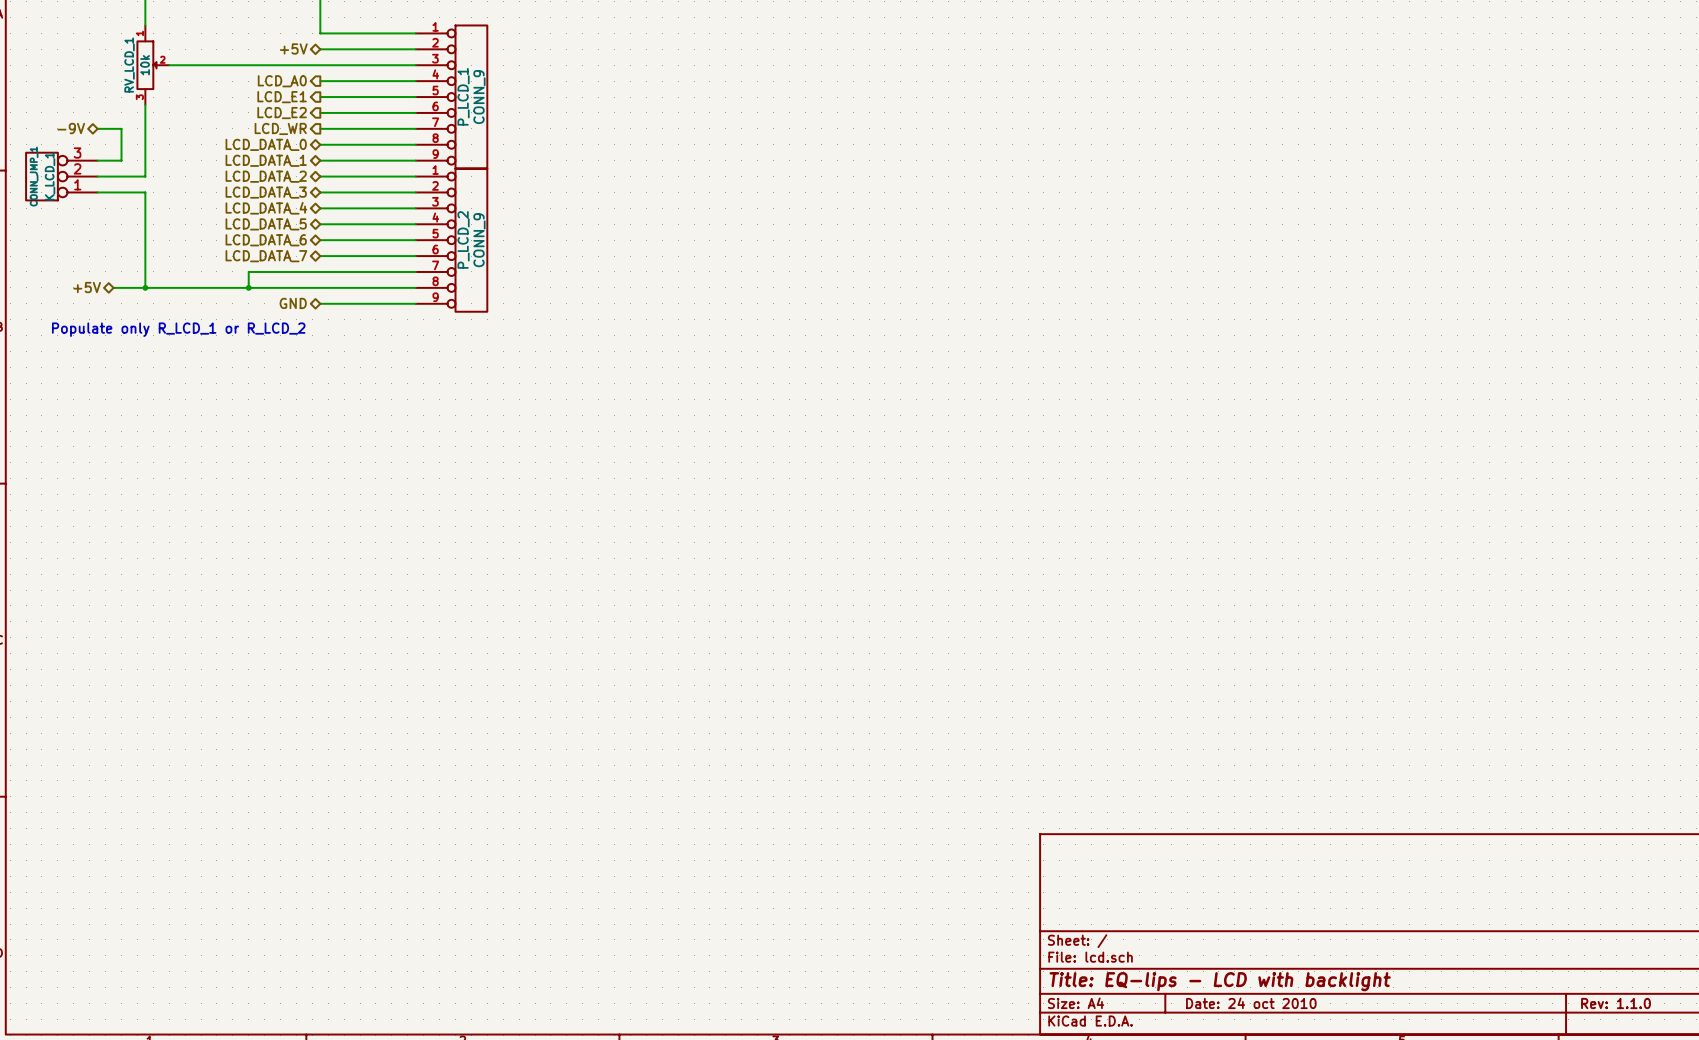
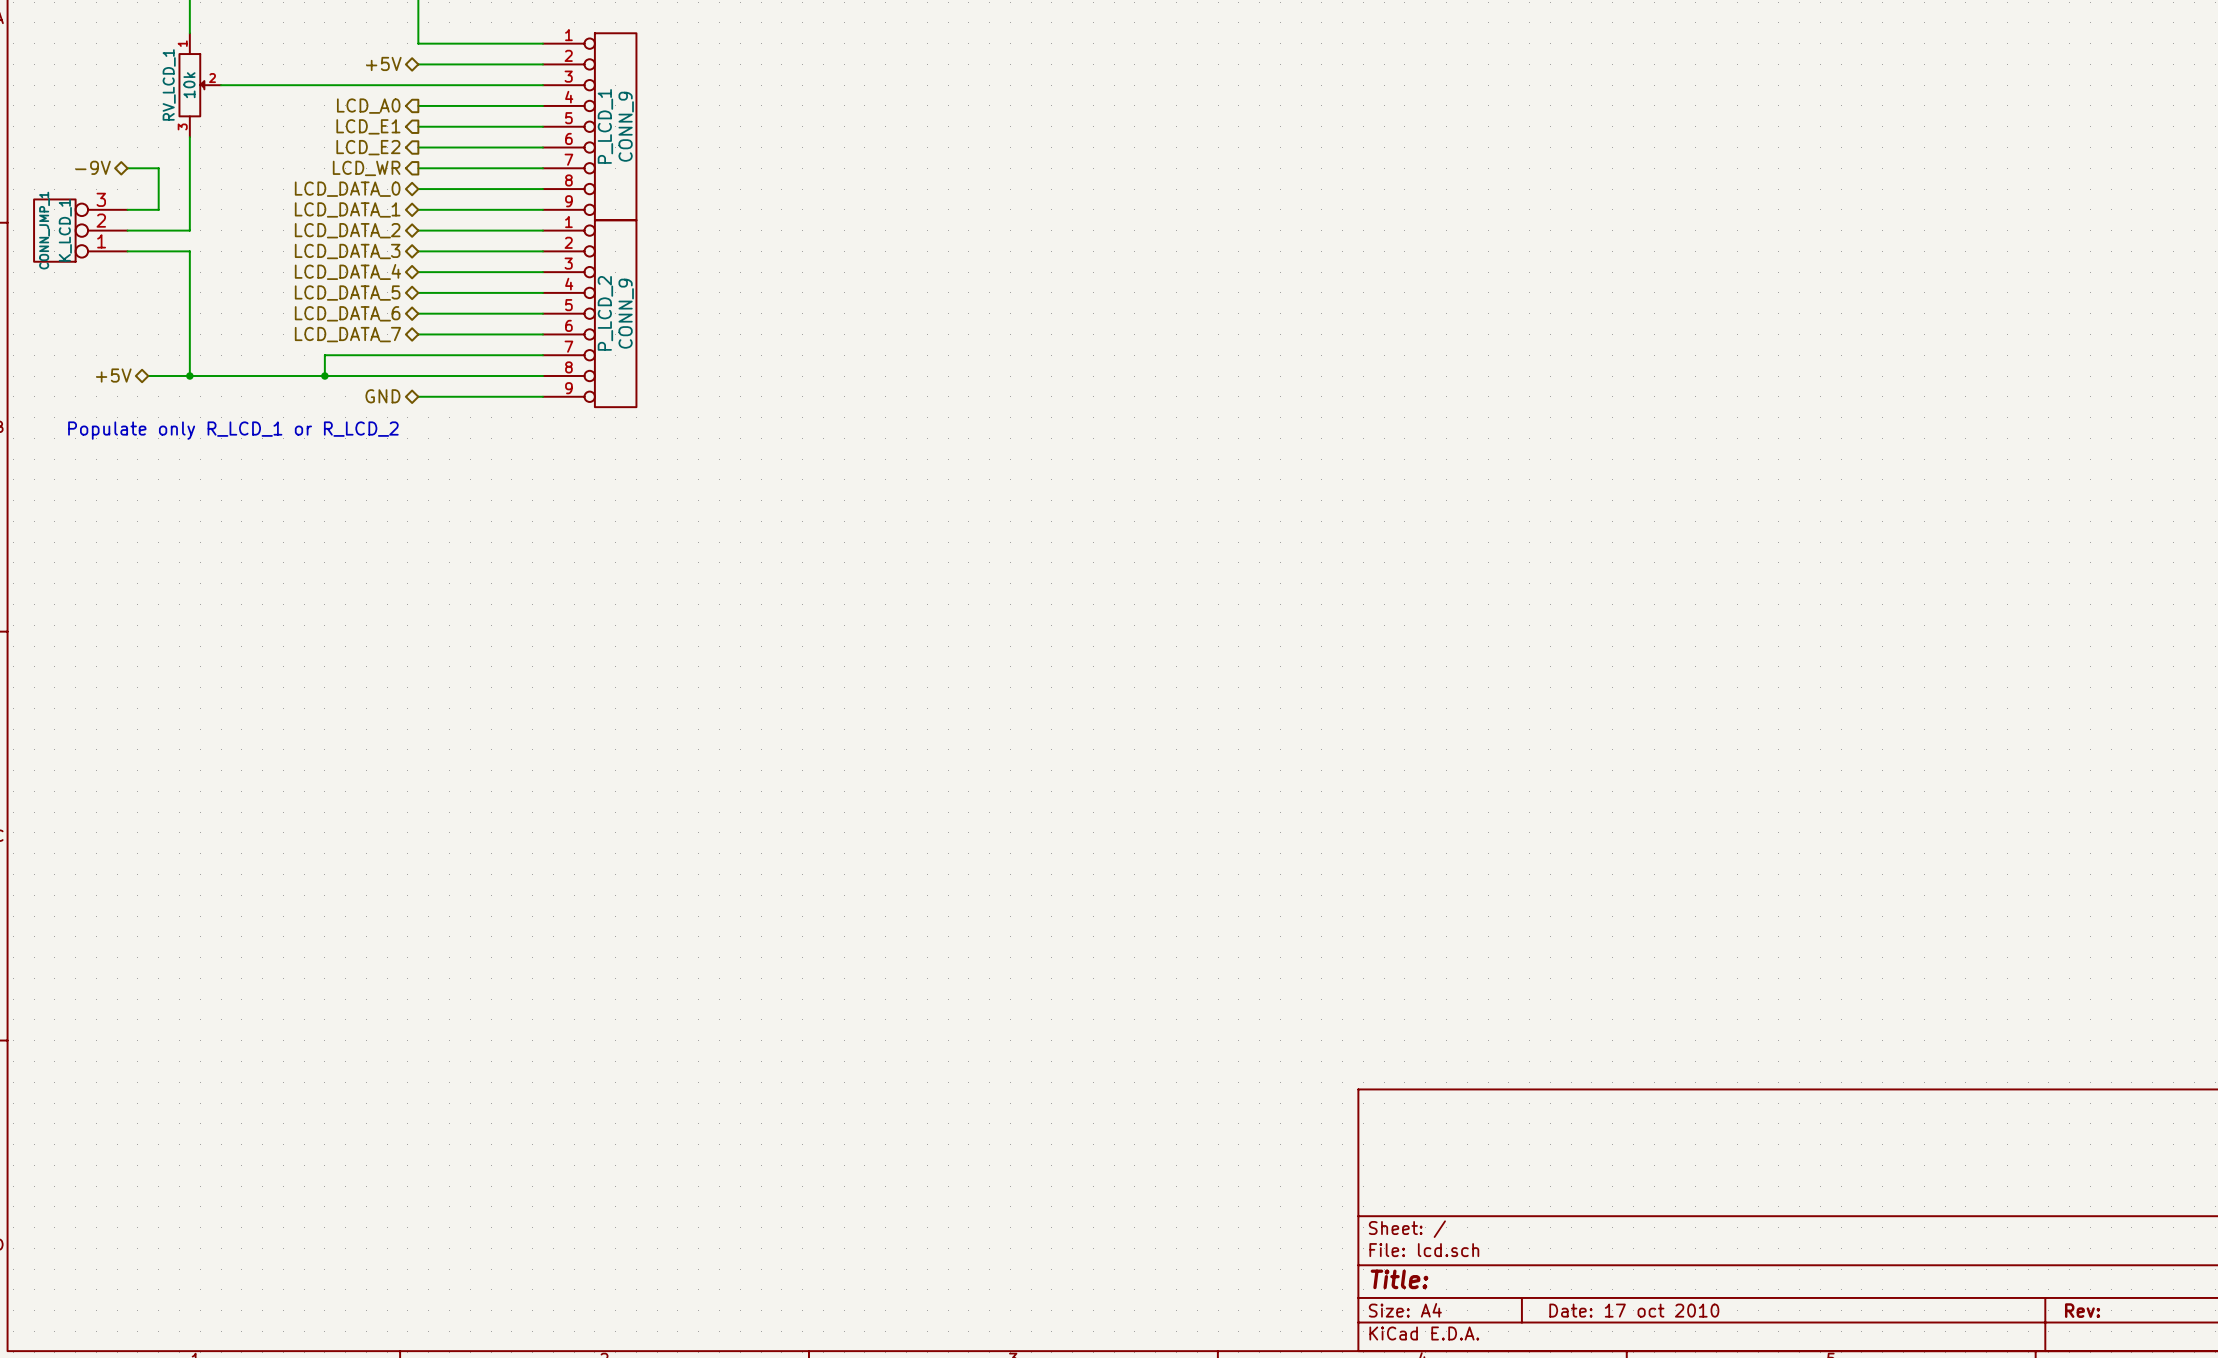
title block: Title: EQ-lips - LCD with backlight (1220, 981) -> Title: (1399, 1279)
title block: Date: 24 oct 2010 (1251, 1003) -> Date: 17 oct 2010 (1634, 1310)
title block: Rev: 1.1.0 (1616, 1003) -> Rev: (2082, 1310)

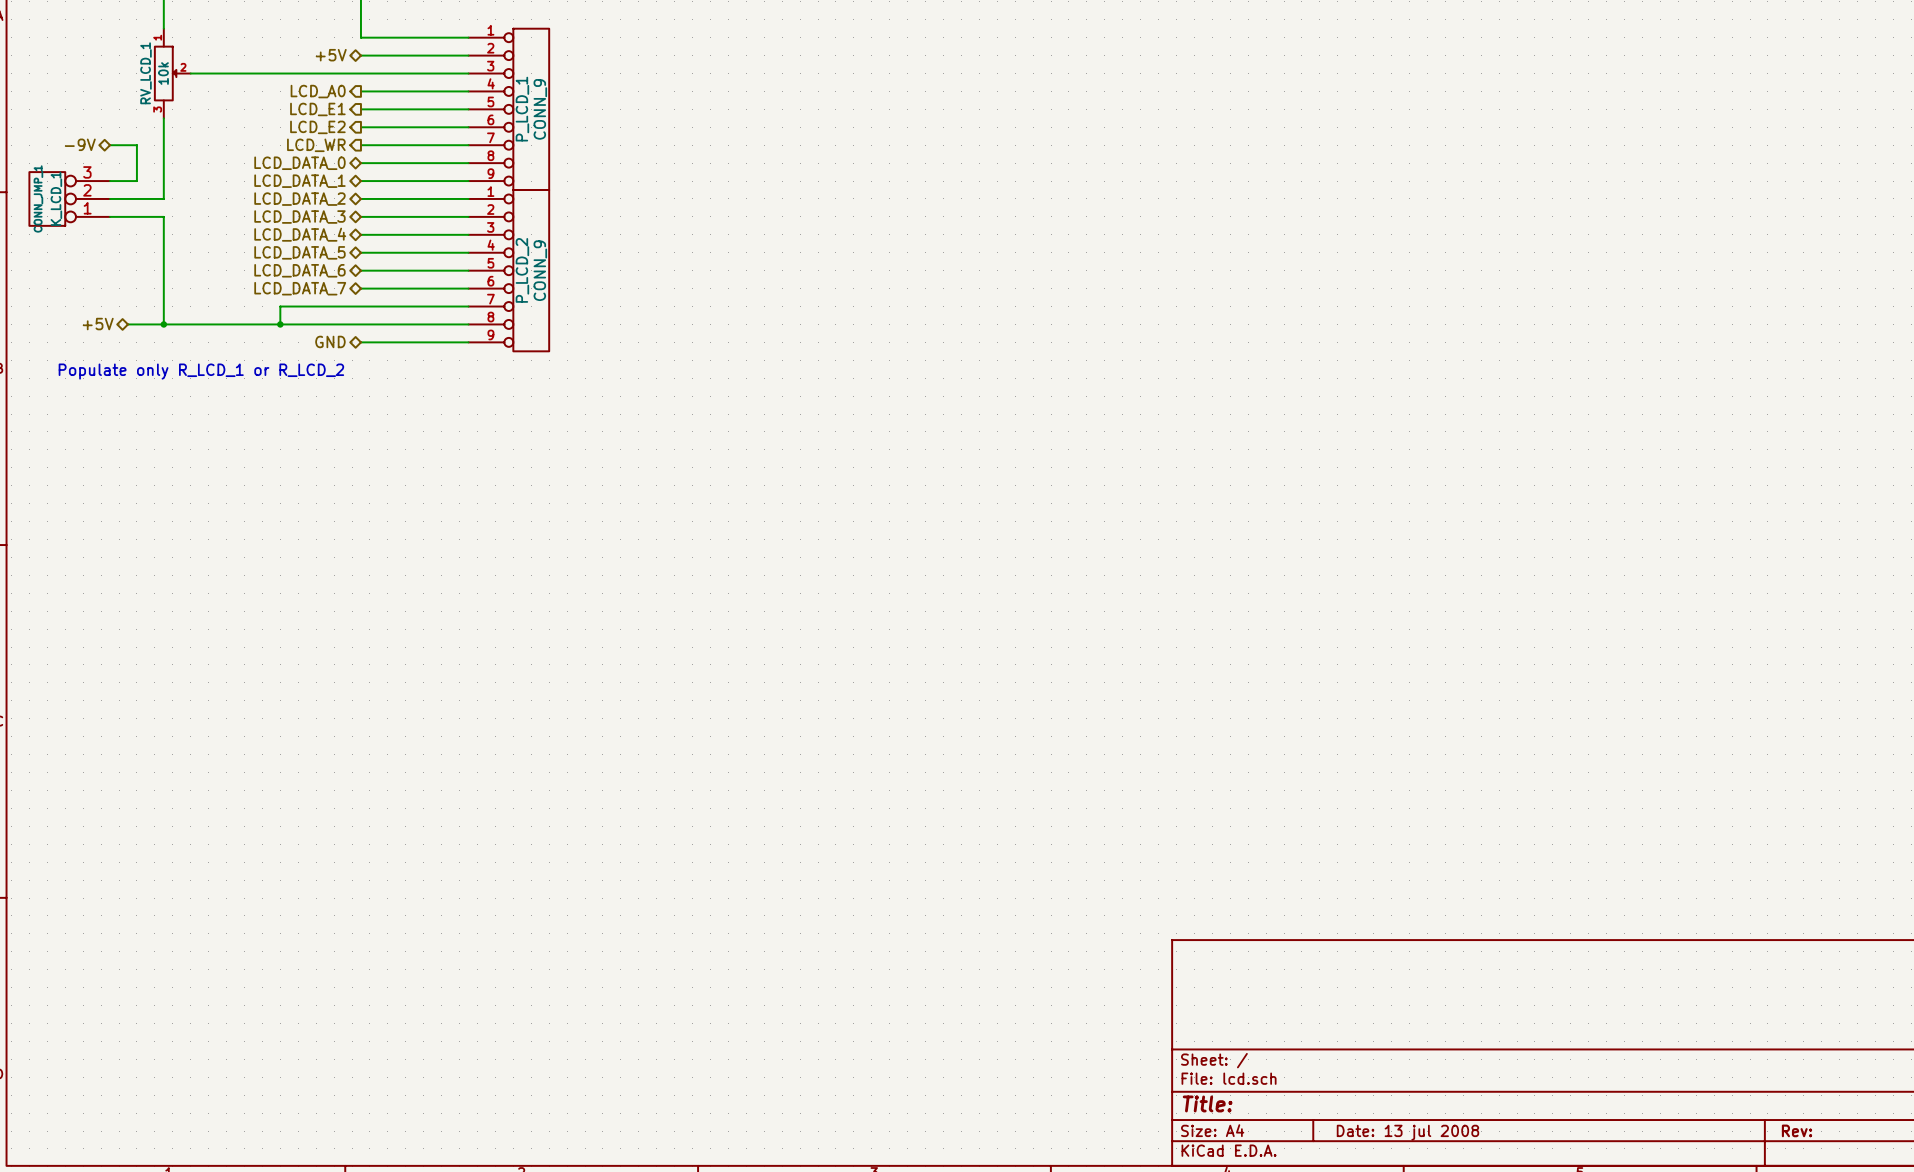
title block: Date: 17 oct 2010 (1634, 1310) -> Date: 13 jul 2008 (1407, 1132)

